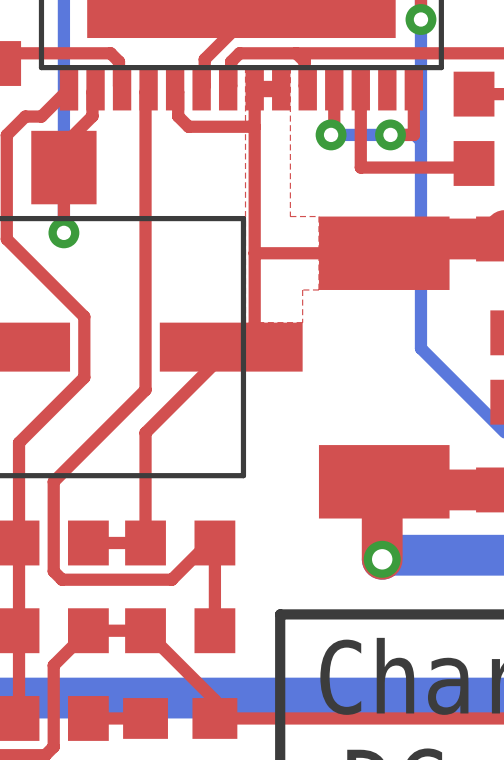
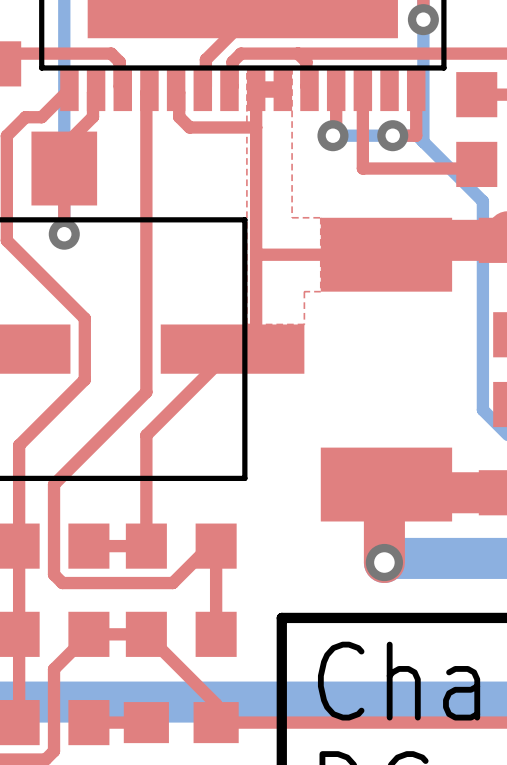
bottom track: (420, 141) (420, 348) (480, 407) -> (423, 141) (482, 201) (482, 409)

